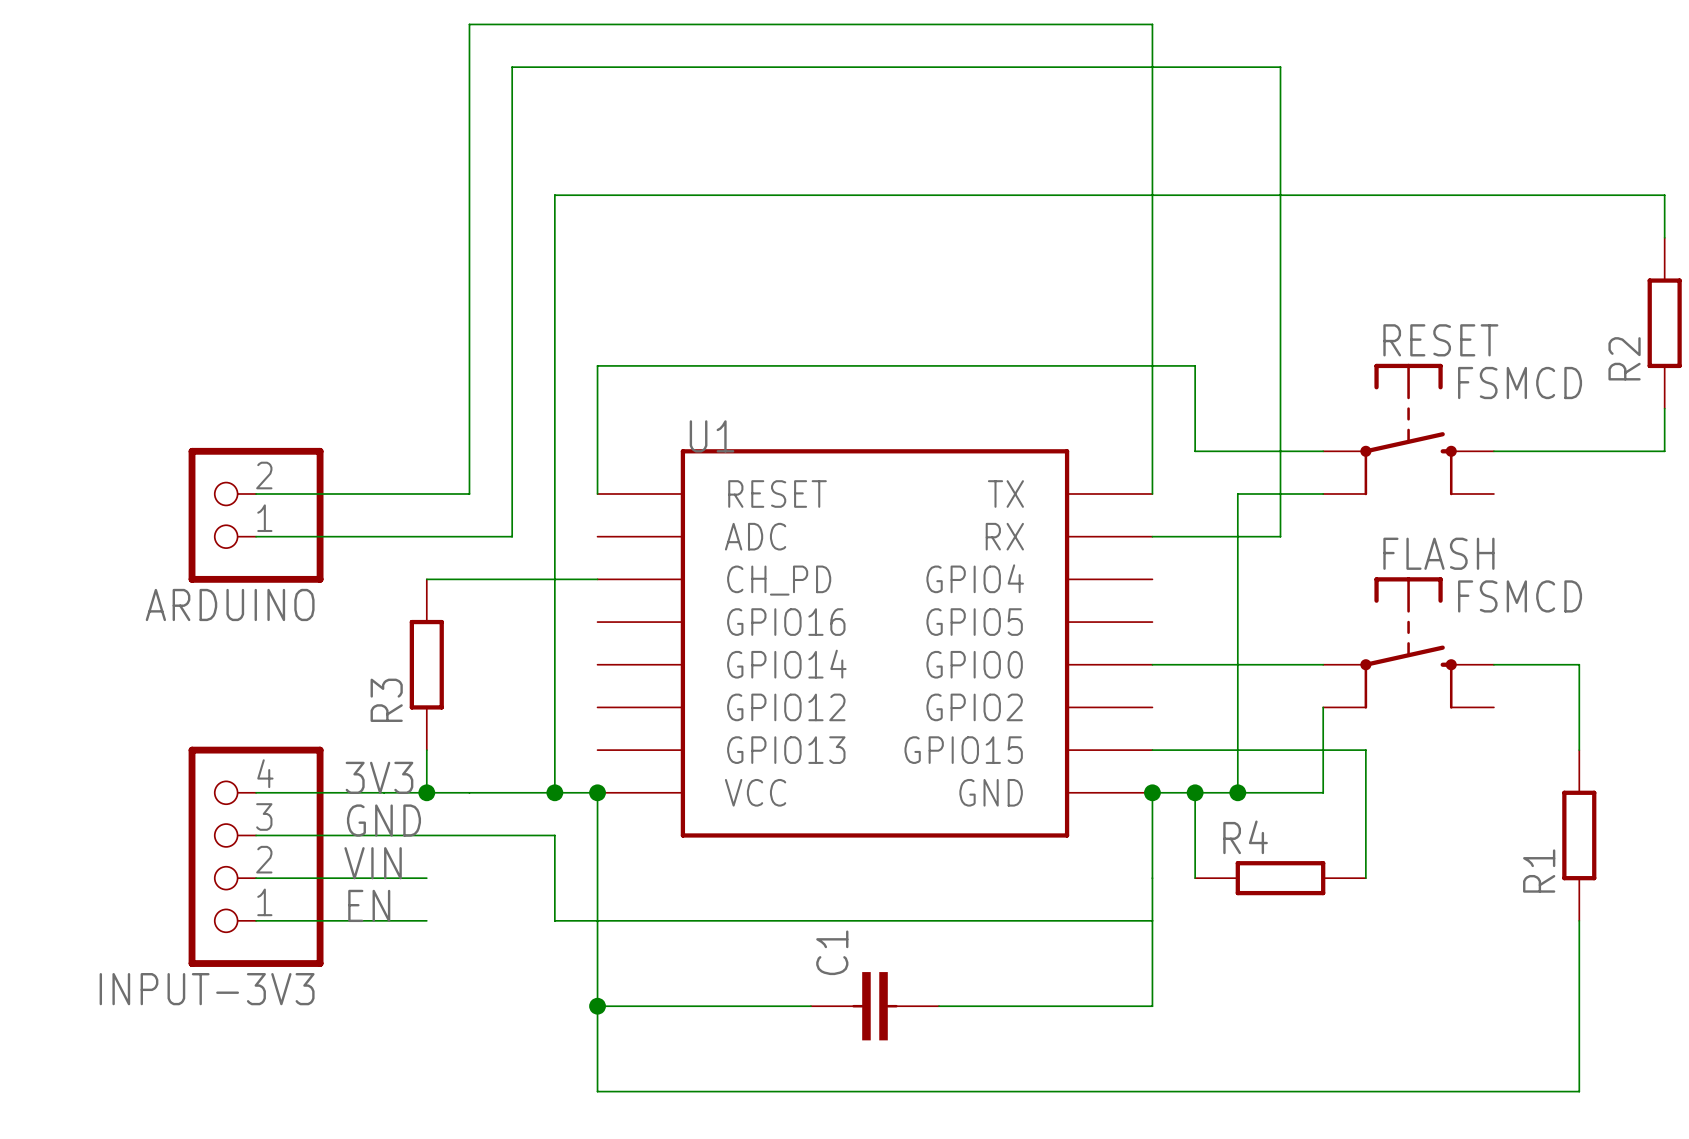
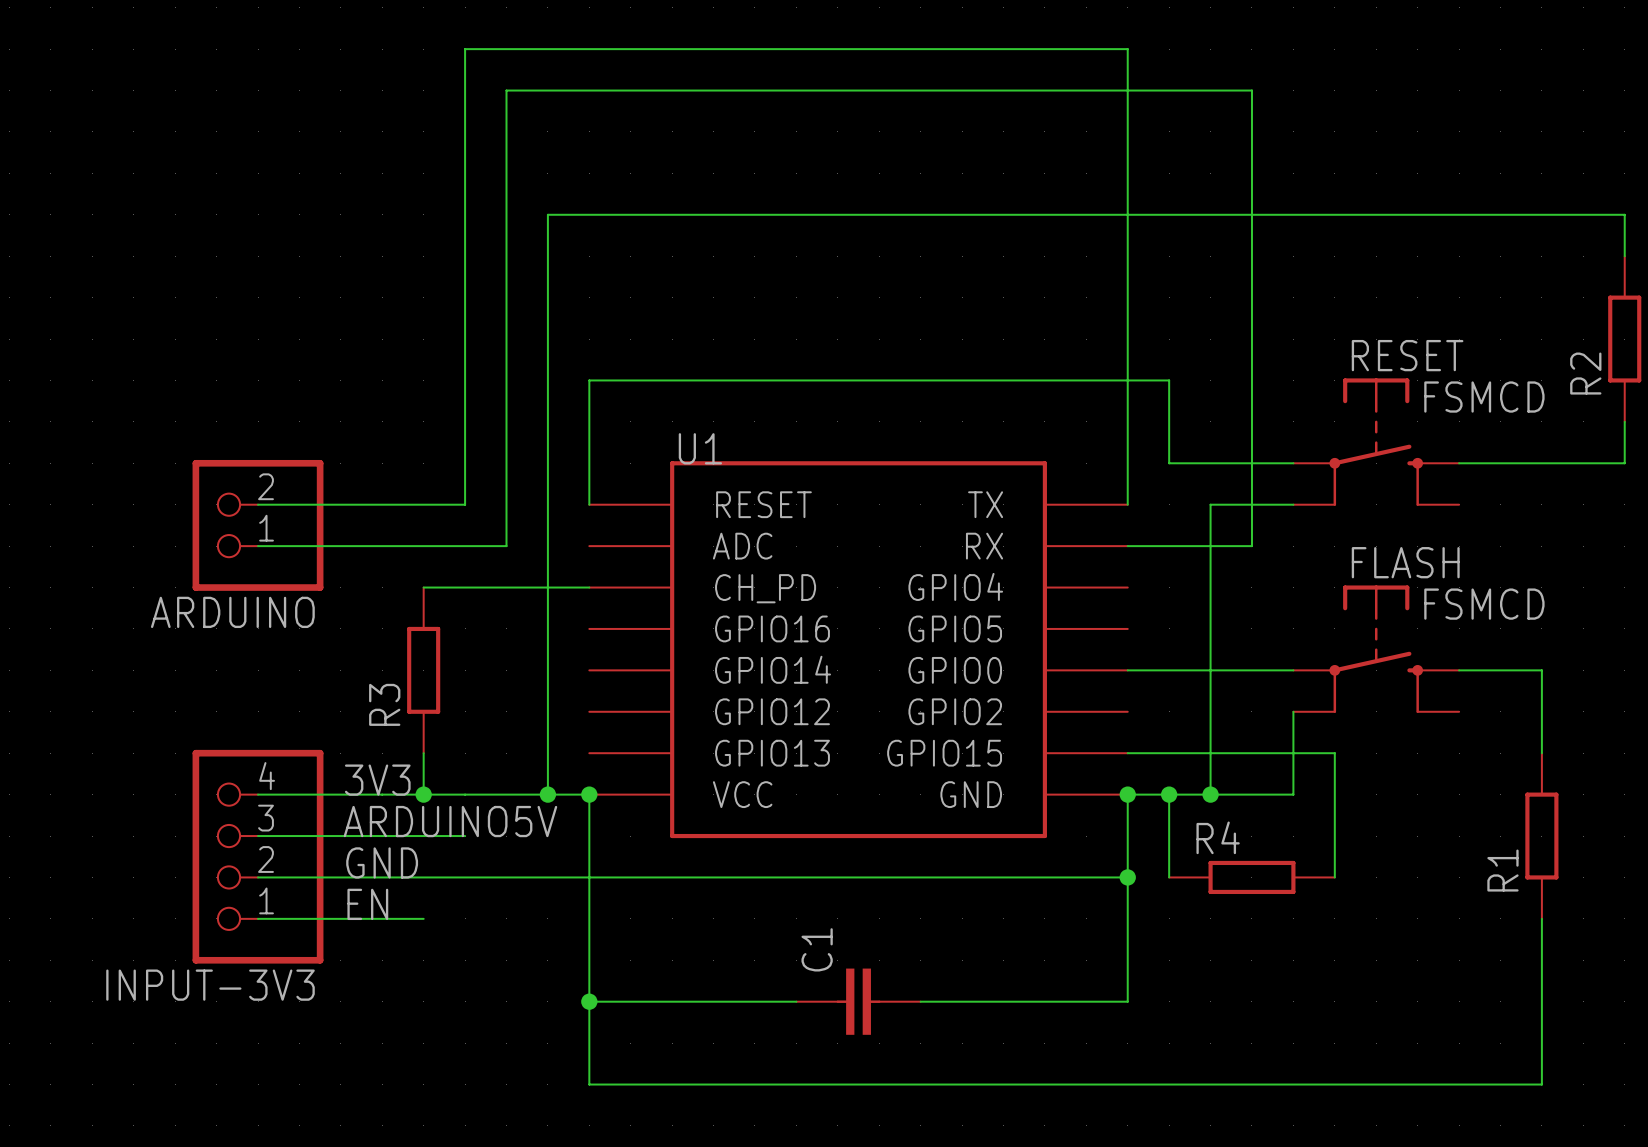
label: GND (383, 820) -> ARDUINO5V (450, 821)
wire: (469, 835) (554, 835) (554, 920) (1152, 920) -> none
label: VIN (373, 863) -> GND (382, 862)
wire: none -> (423, 877) (1127, 877)
junction: none -> (1127, 877)

